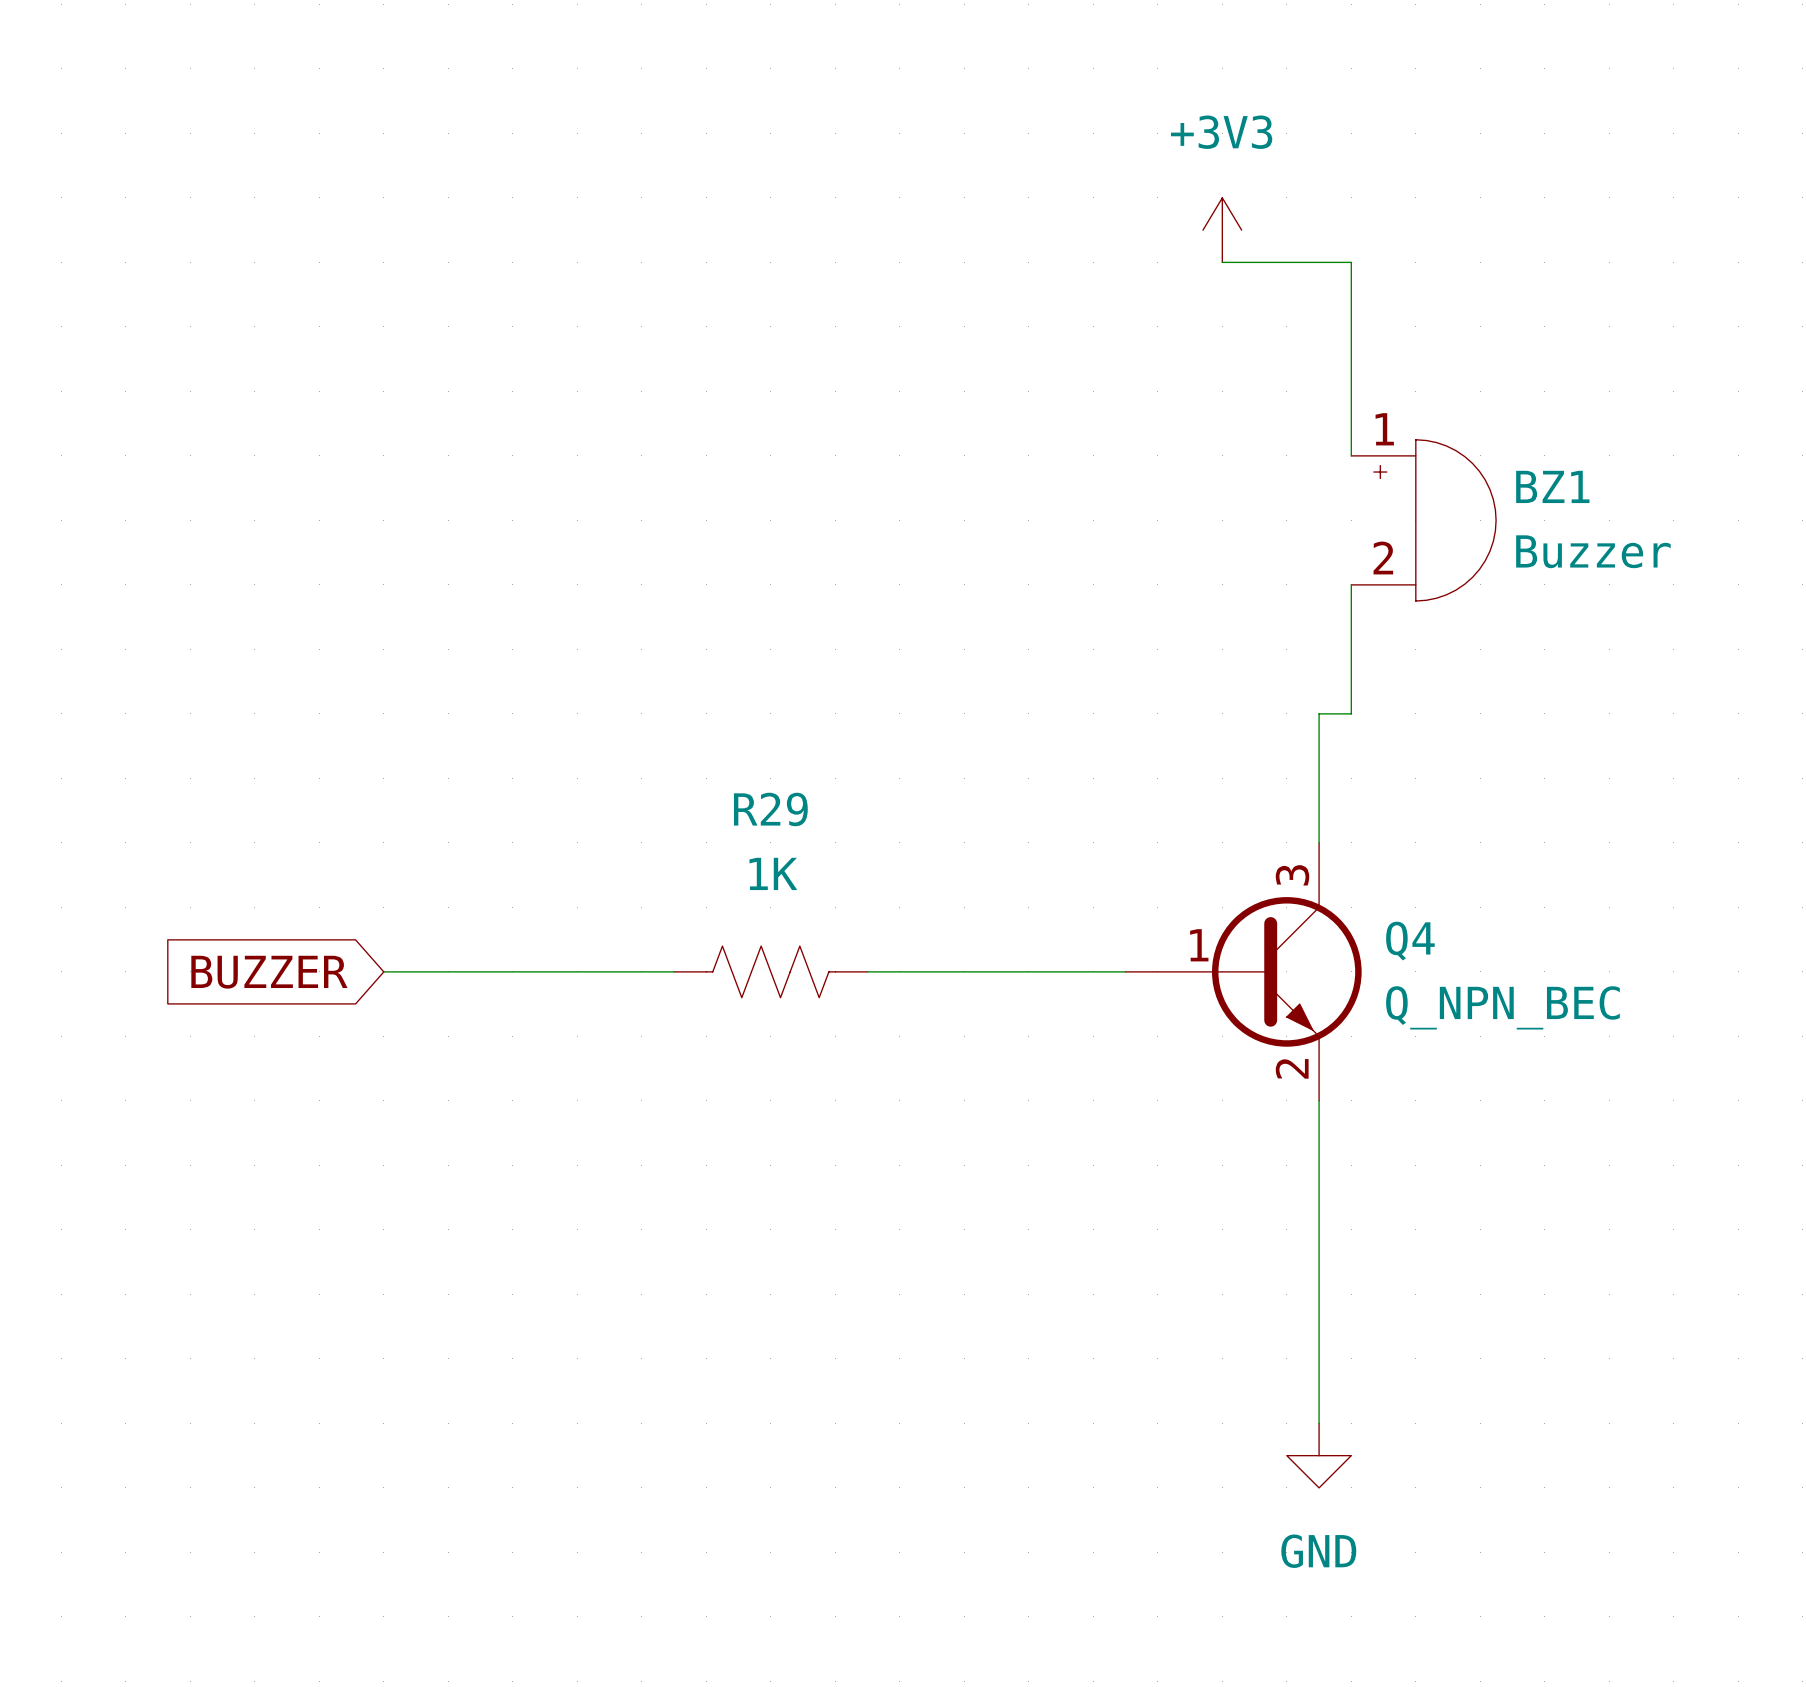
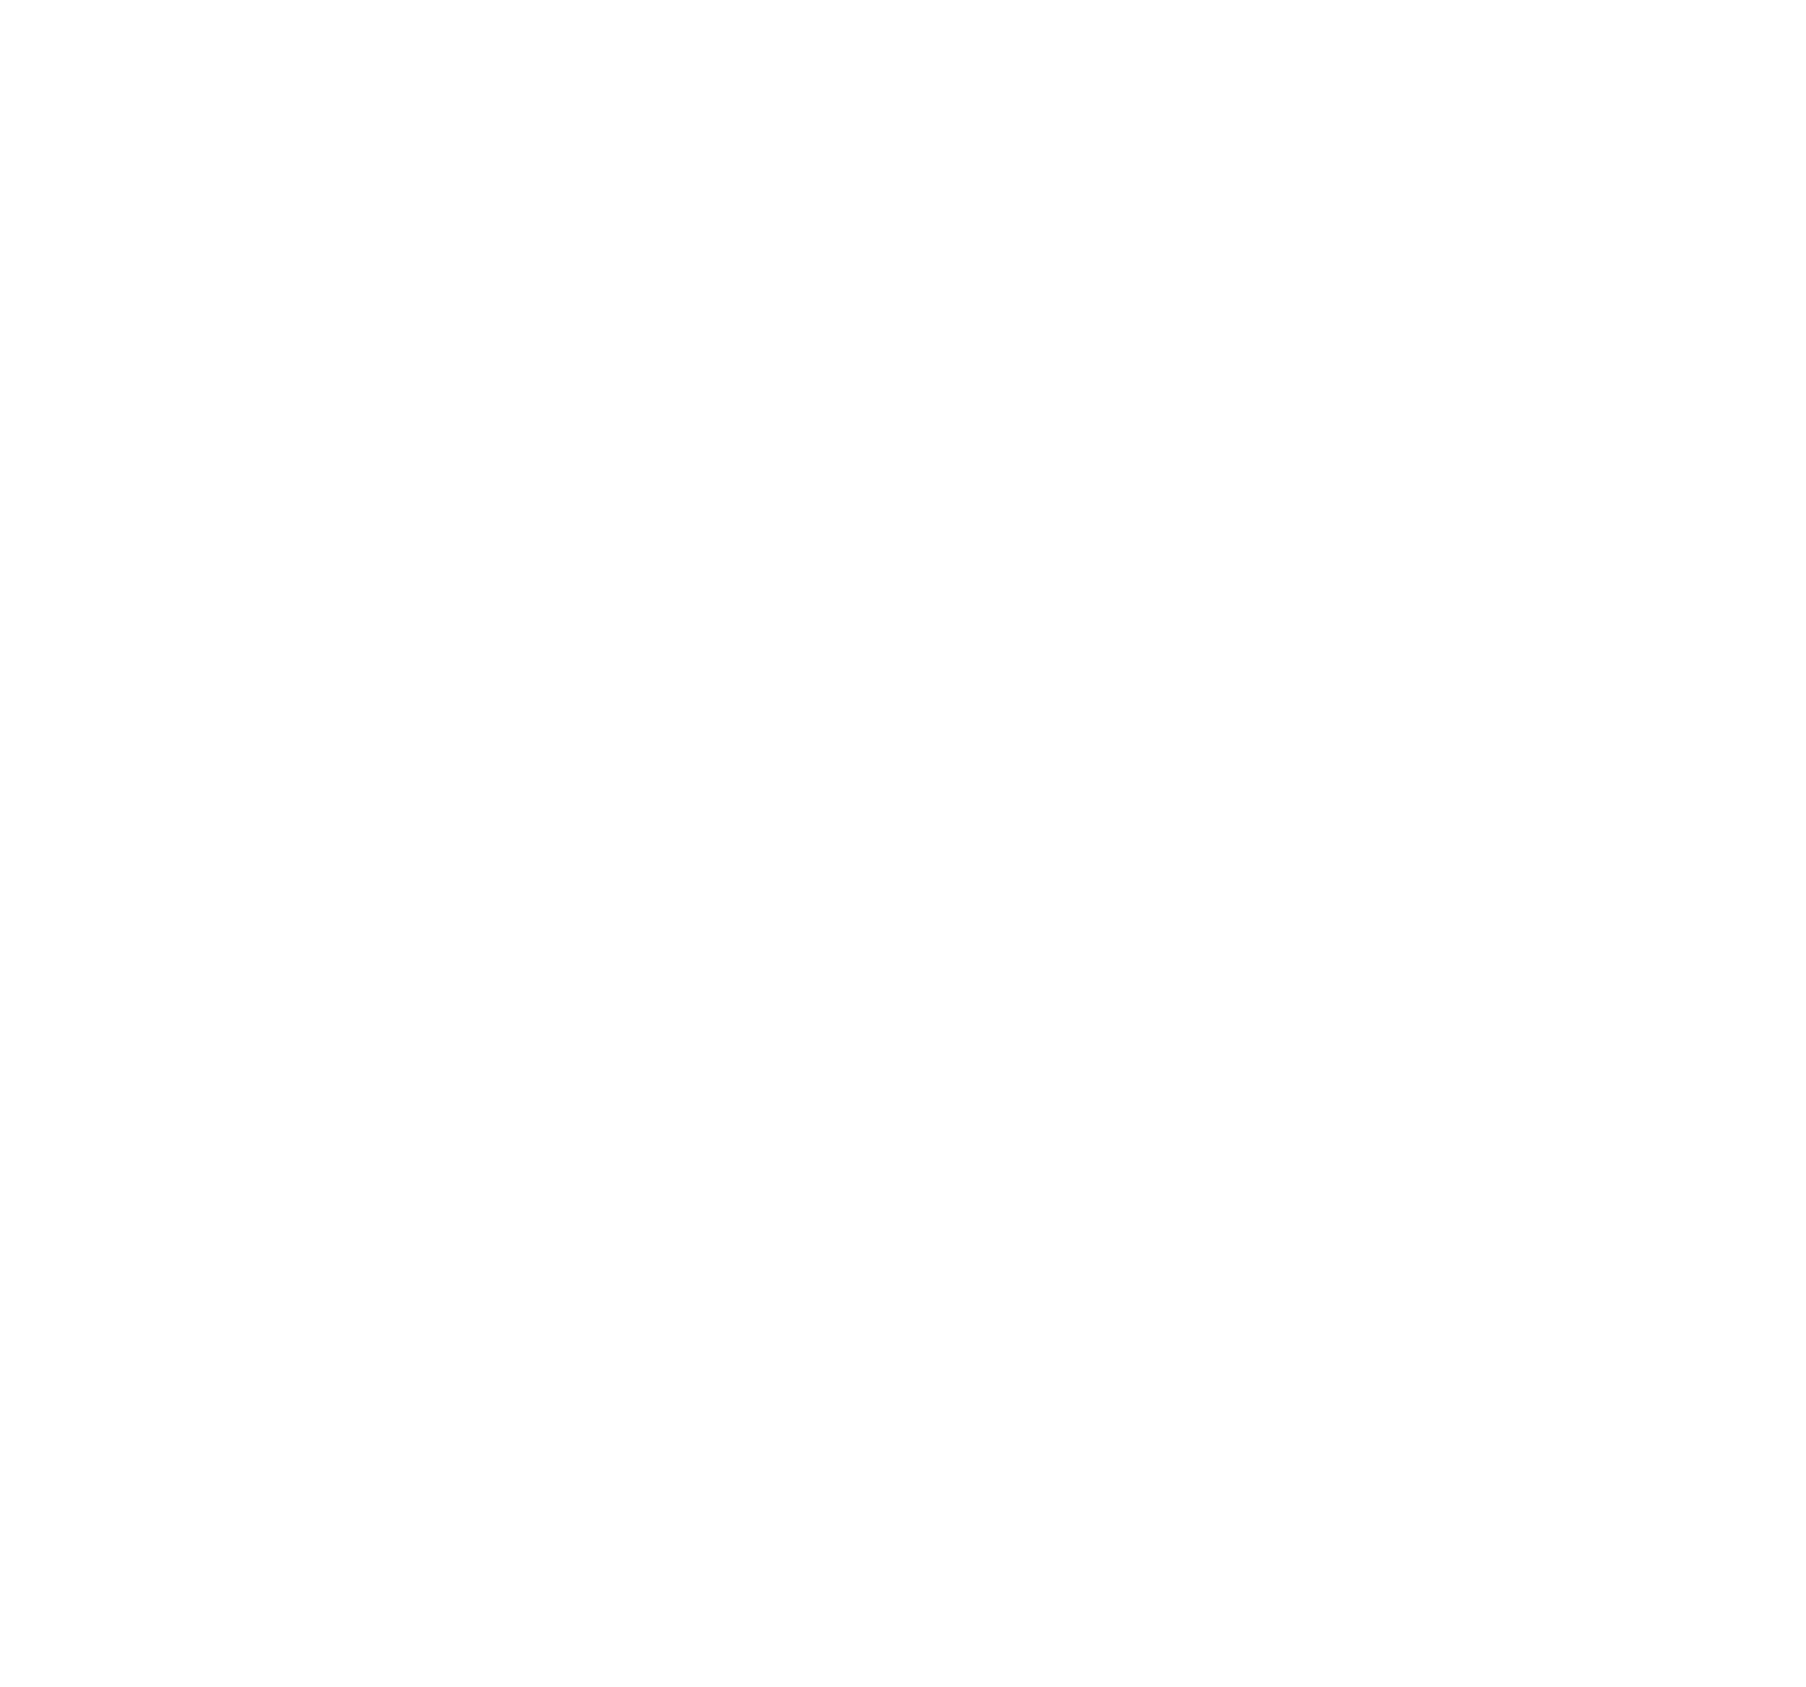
power symbol: +3V3 (1222, 230) -> none
wire: (1222, 262) (1351, 262) (1351, 455) -> none
BZ1: Buzzer (1423, 520) -> none
wire: (1351, 584) (1351, 713) (1319, 713) (1319, 842) -> none
wire: (383, 971) (674, 971) -> none
R29: 1K (770, 971) -> none
wire: (867, 971) (1125, 971) -> none
Q4: Q_NPN_BEC (1243, 971) -> none
global label: BUZZER (269, 972) -> none
wire: (1319, 1100) (1319, 1423) -> none
power symbol: GND (1319, 1455) -> none

